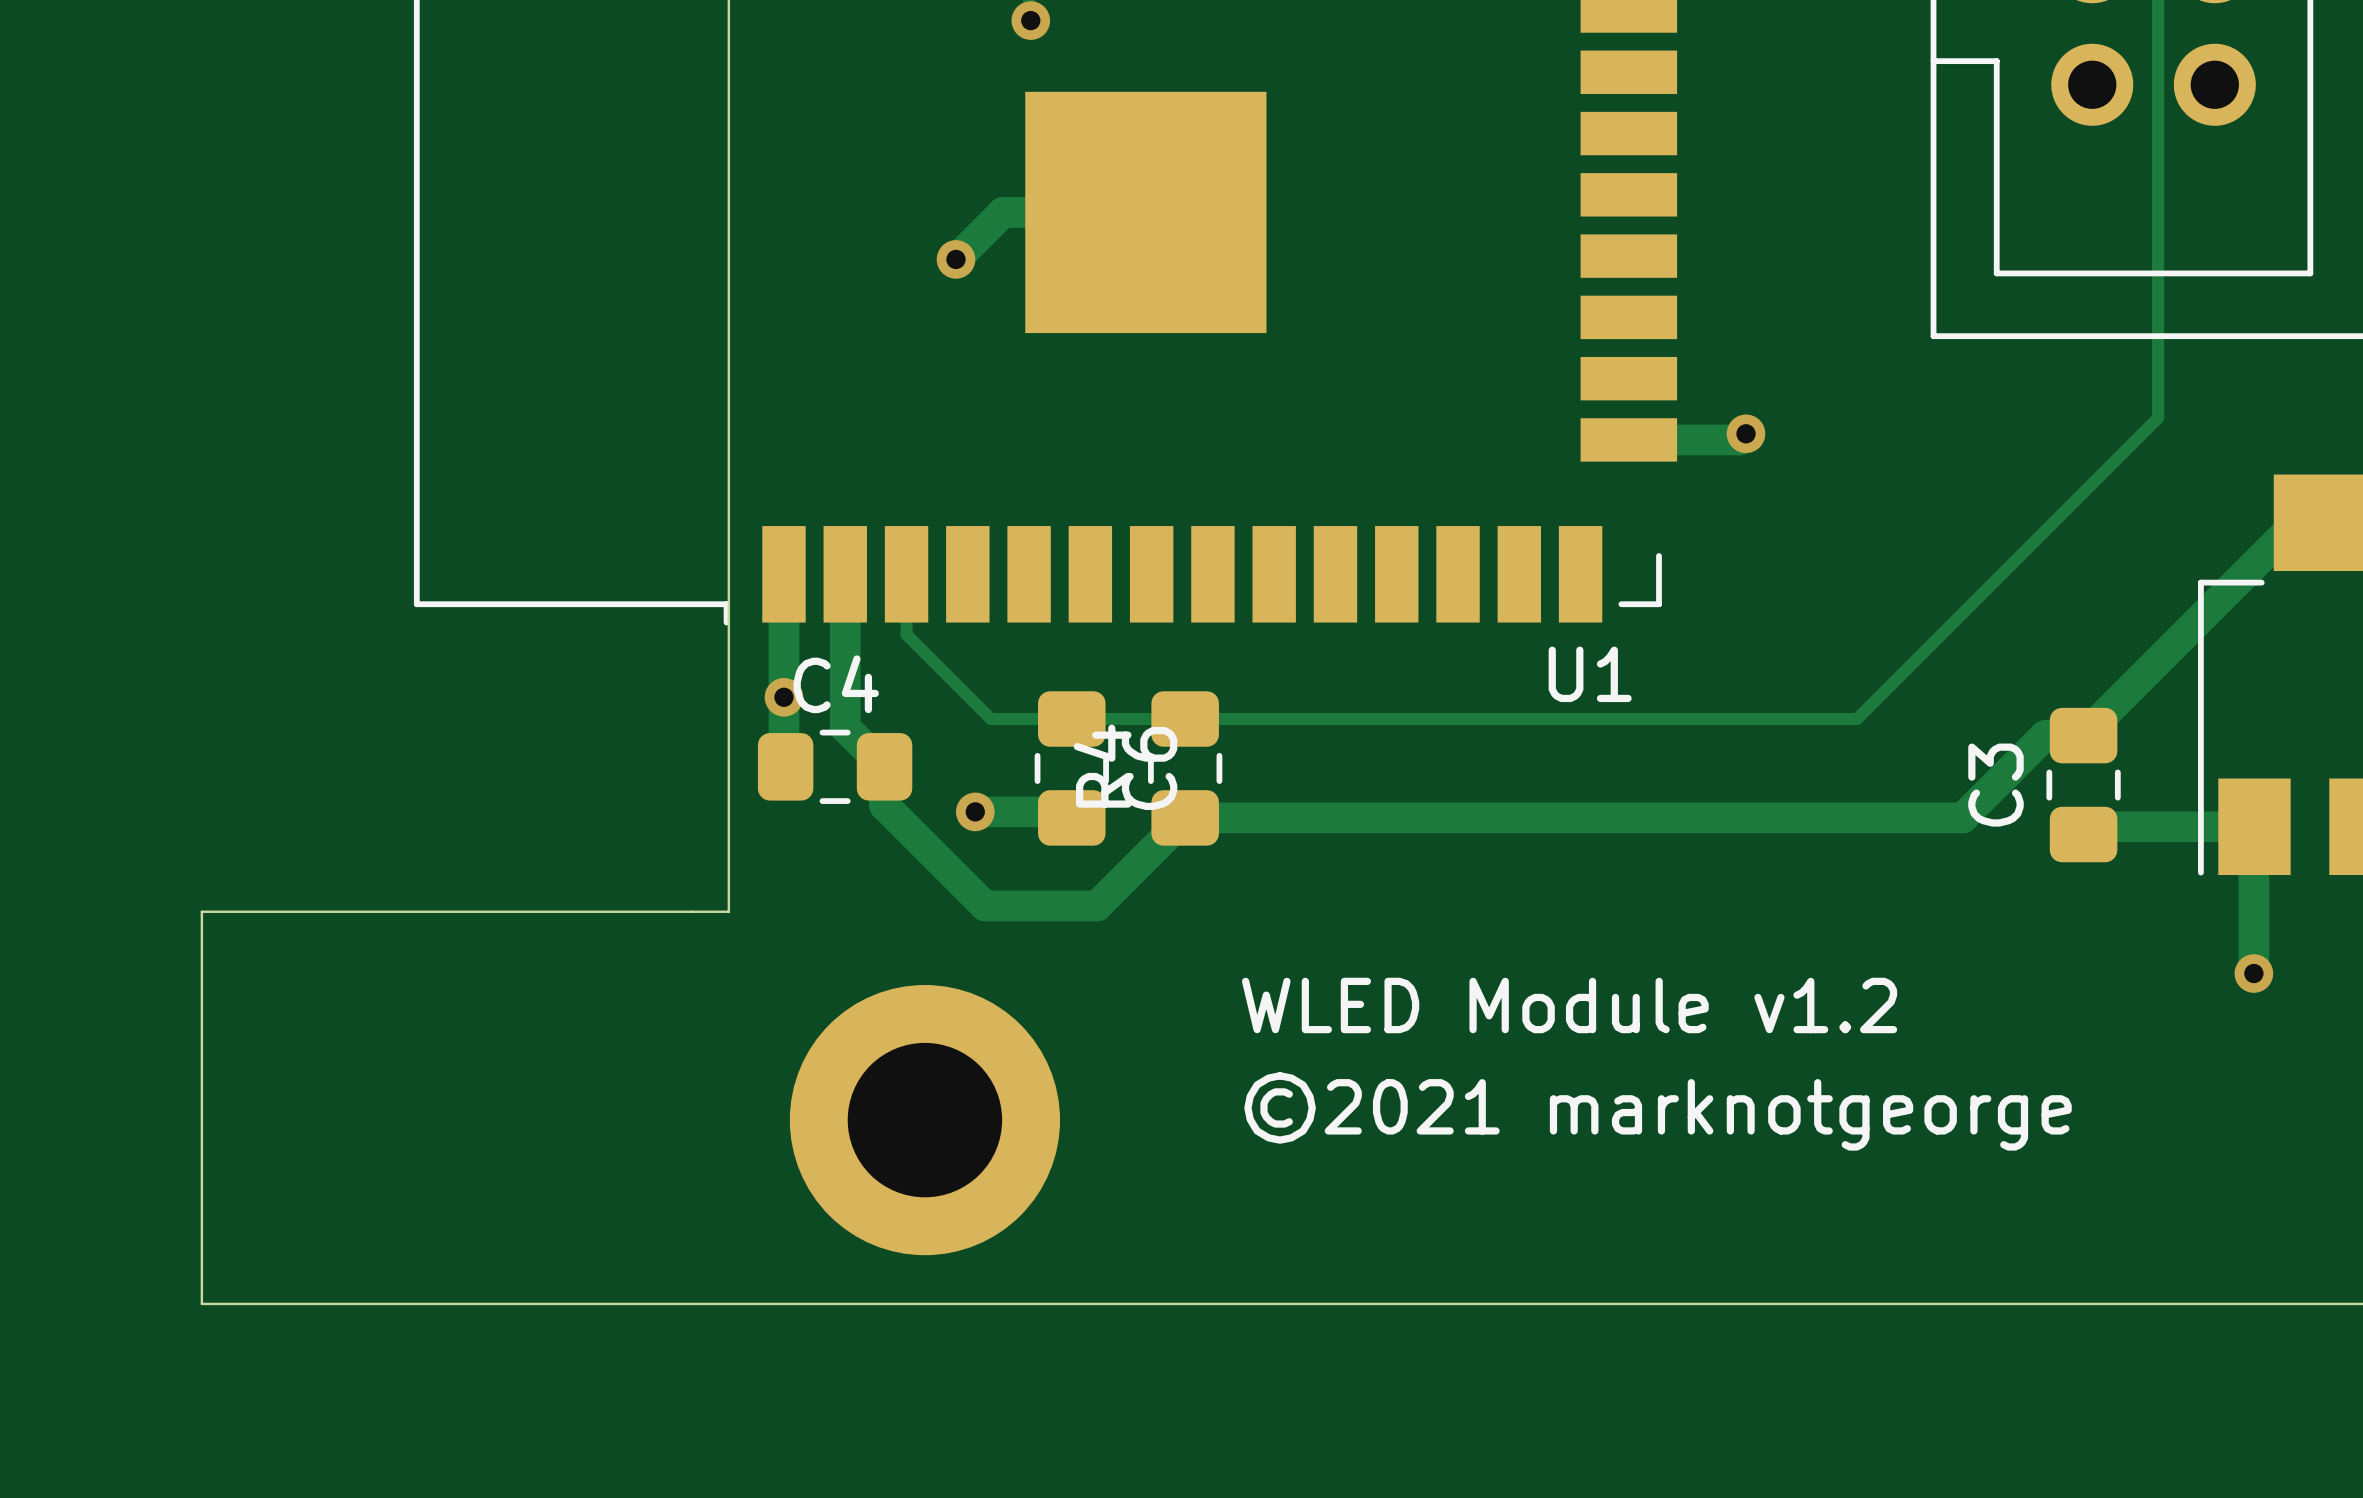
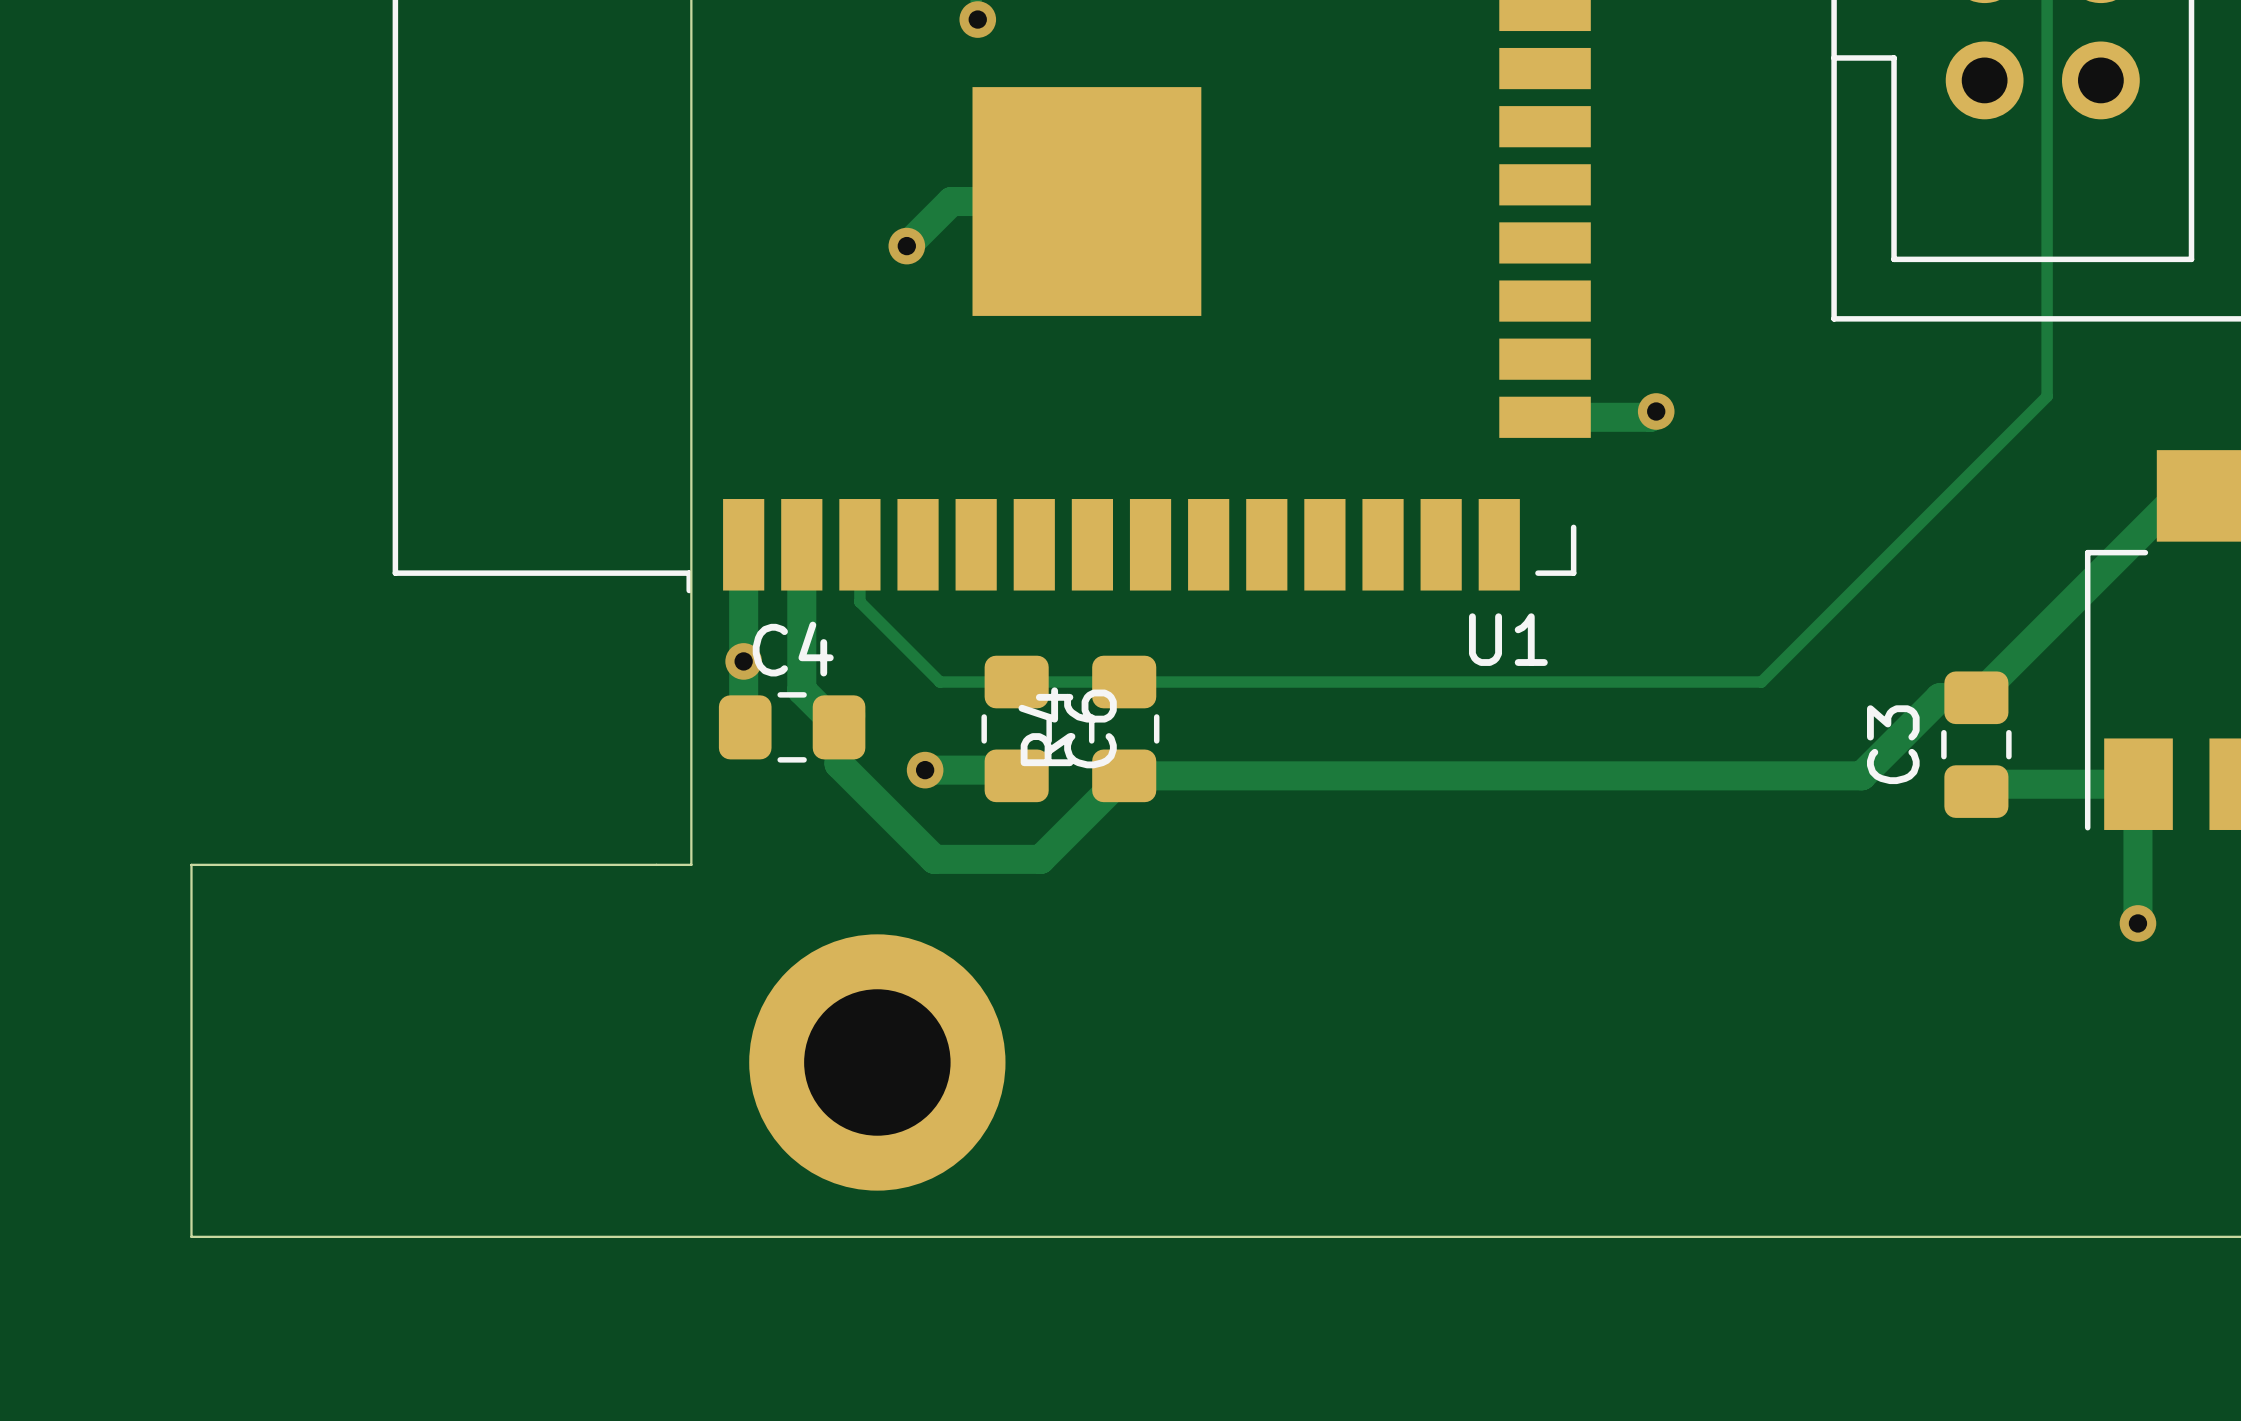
text: WLED Module v1.2 (1569, 1005) -> none
text: ©2021 marknotgeorge (1658, 1111) -> none

